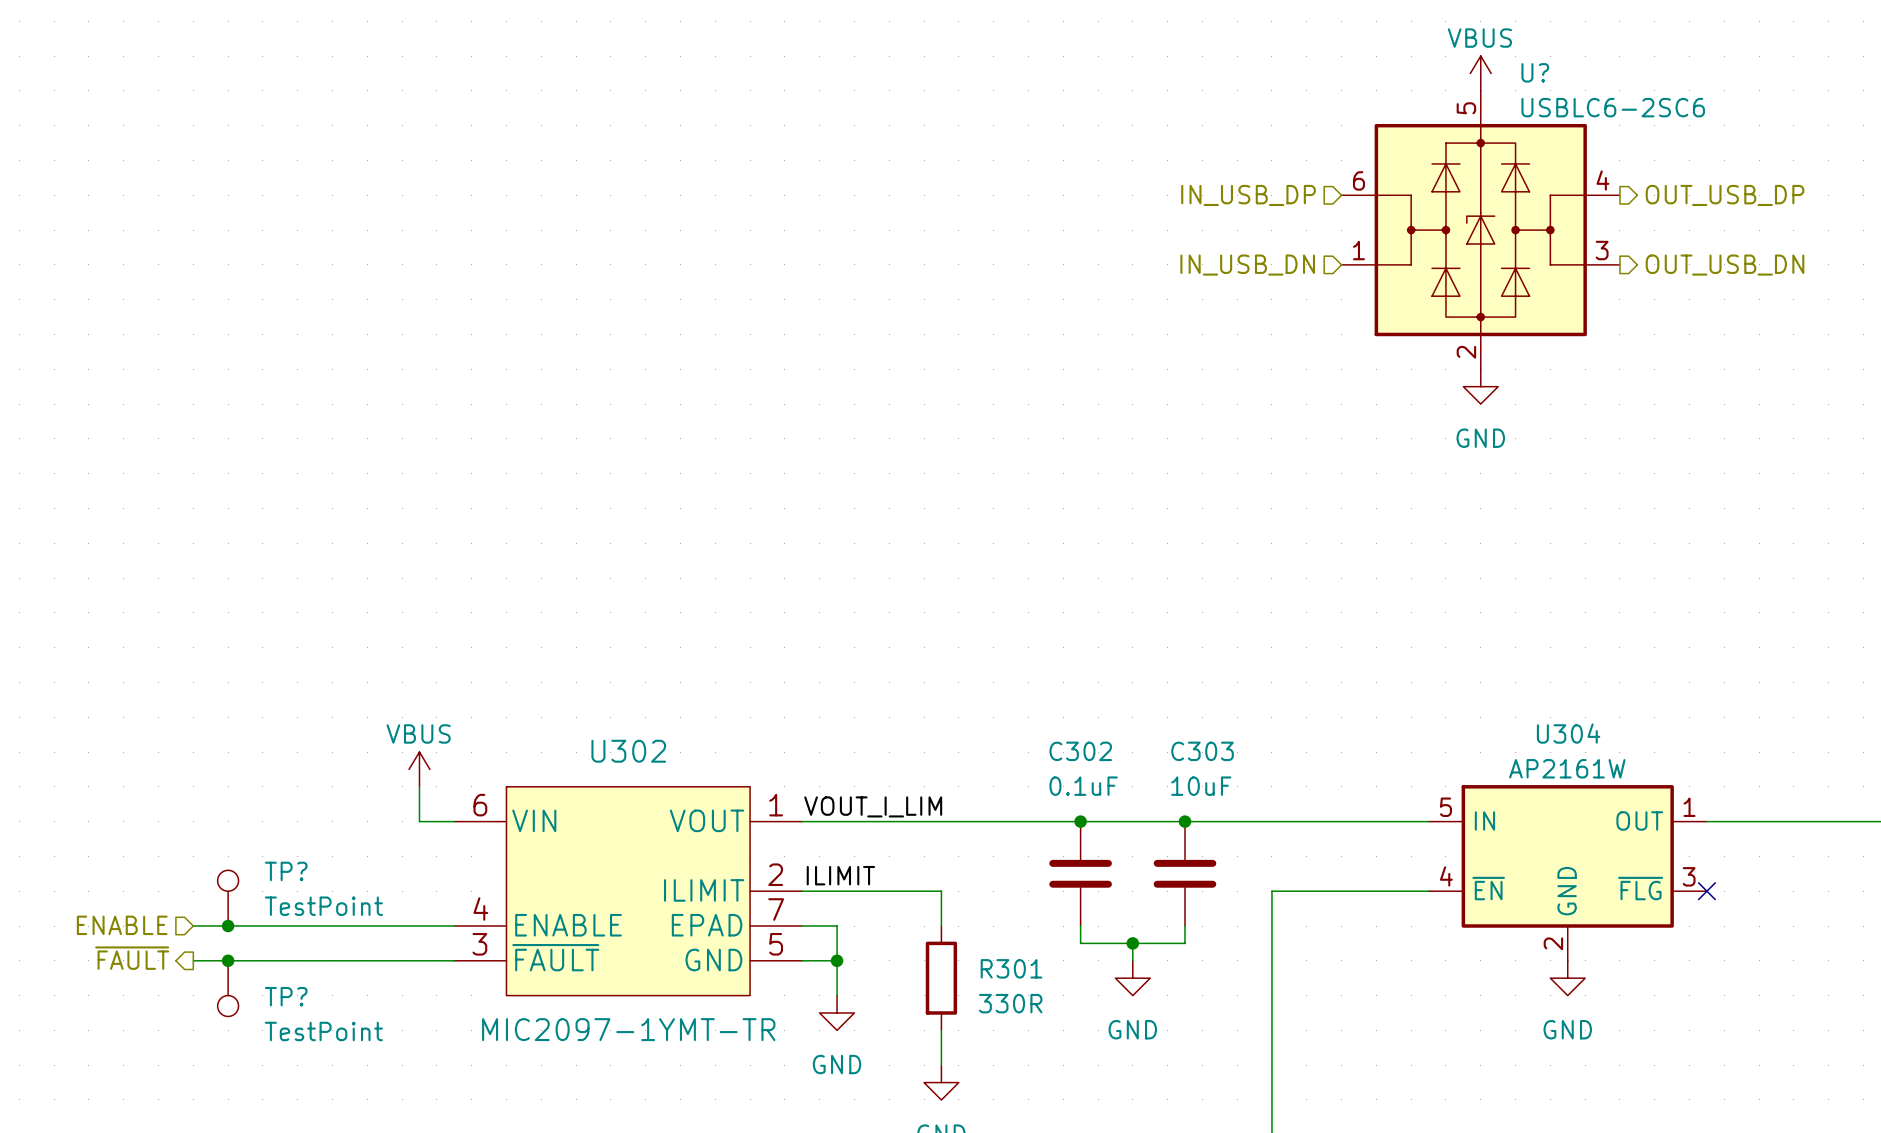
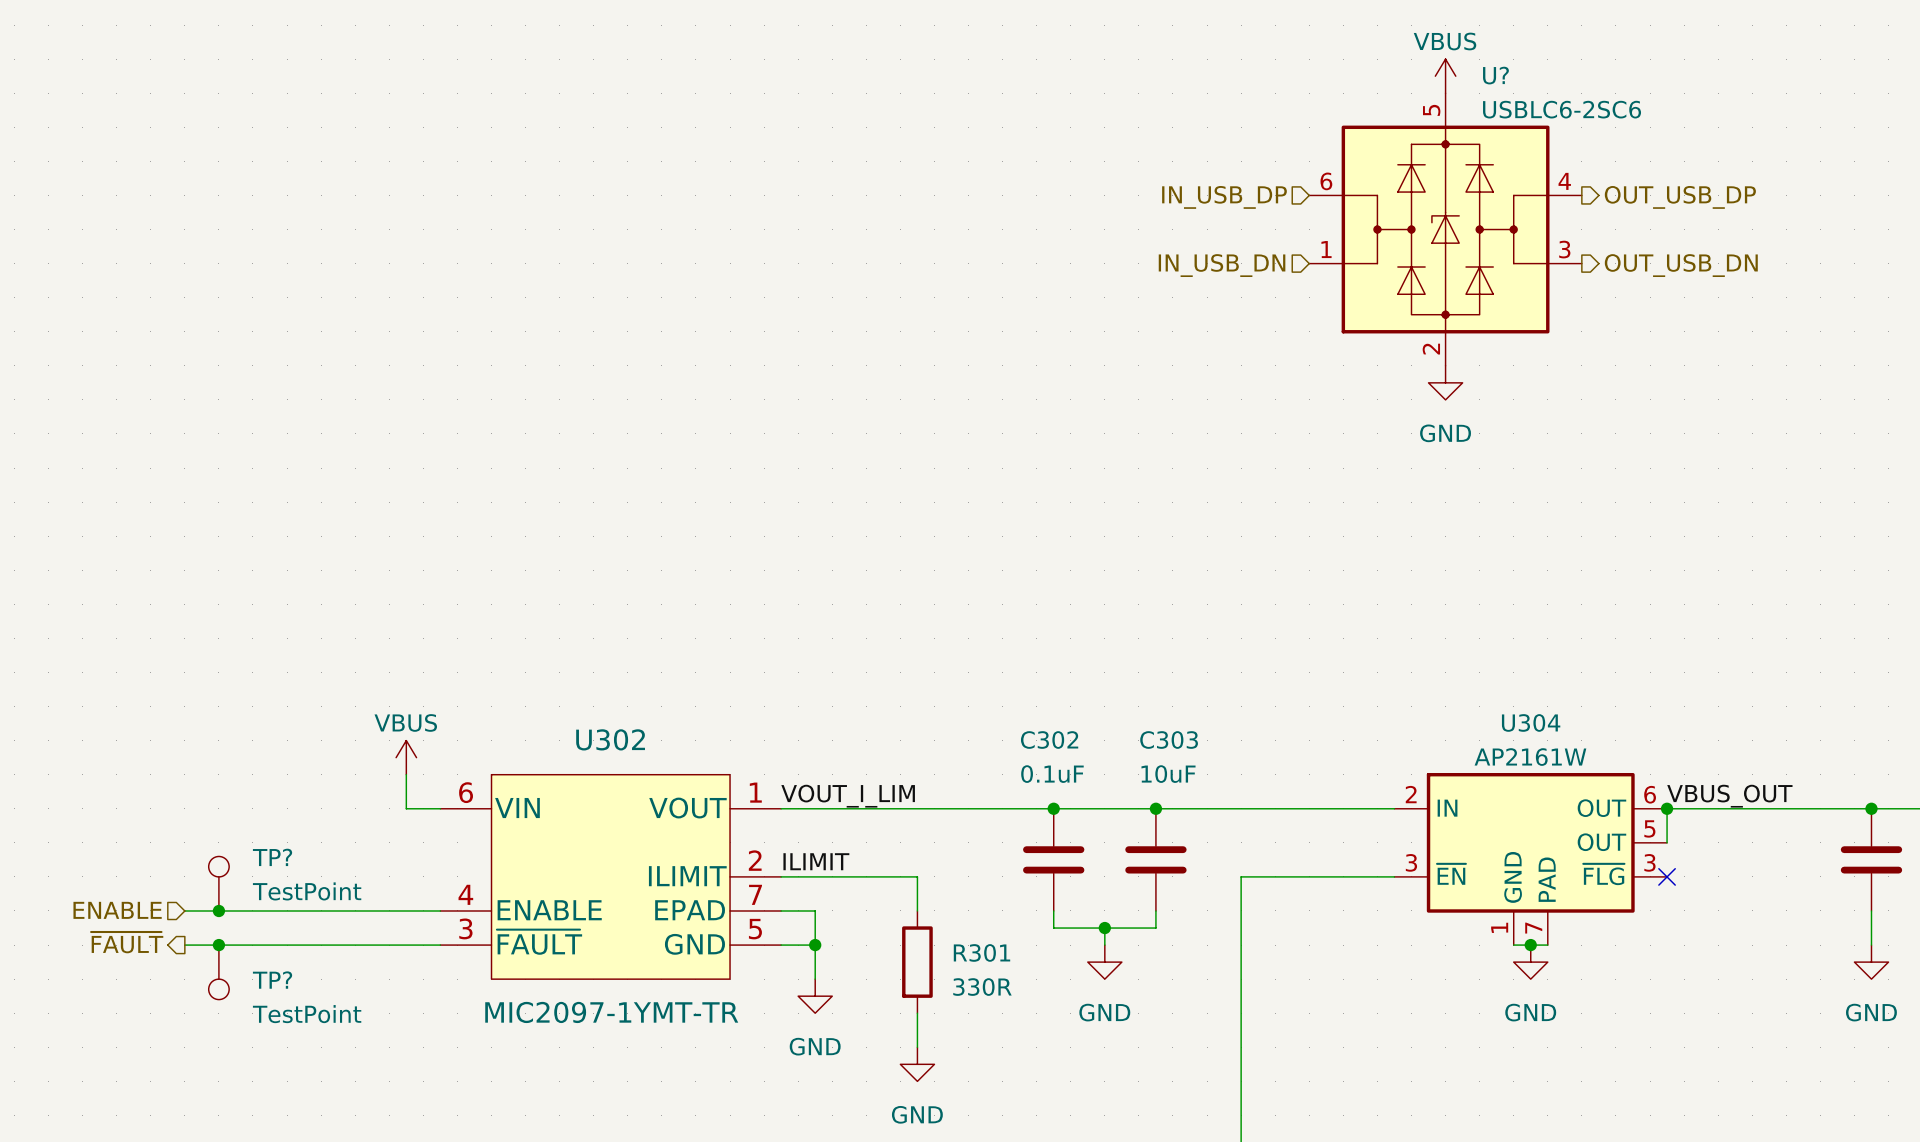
U304 symbol: [1428, 785, 1707, 961] -> [1394, 772, 1668, 946]
label: none -> VBUS_OUT (1729, 796)
wire: none -> (1667, 808) (1667, 842)
junction: none -> (1667, 808)
wire: none -> (1513, 945) (1547, 945)
junction: none -> (1530, 945)

